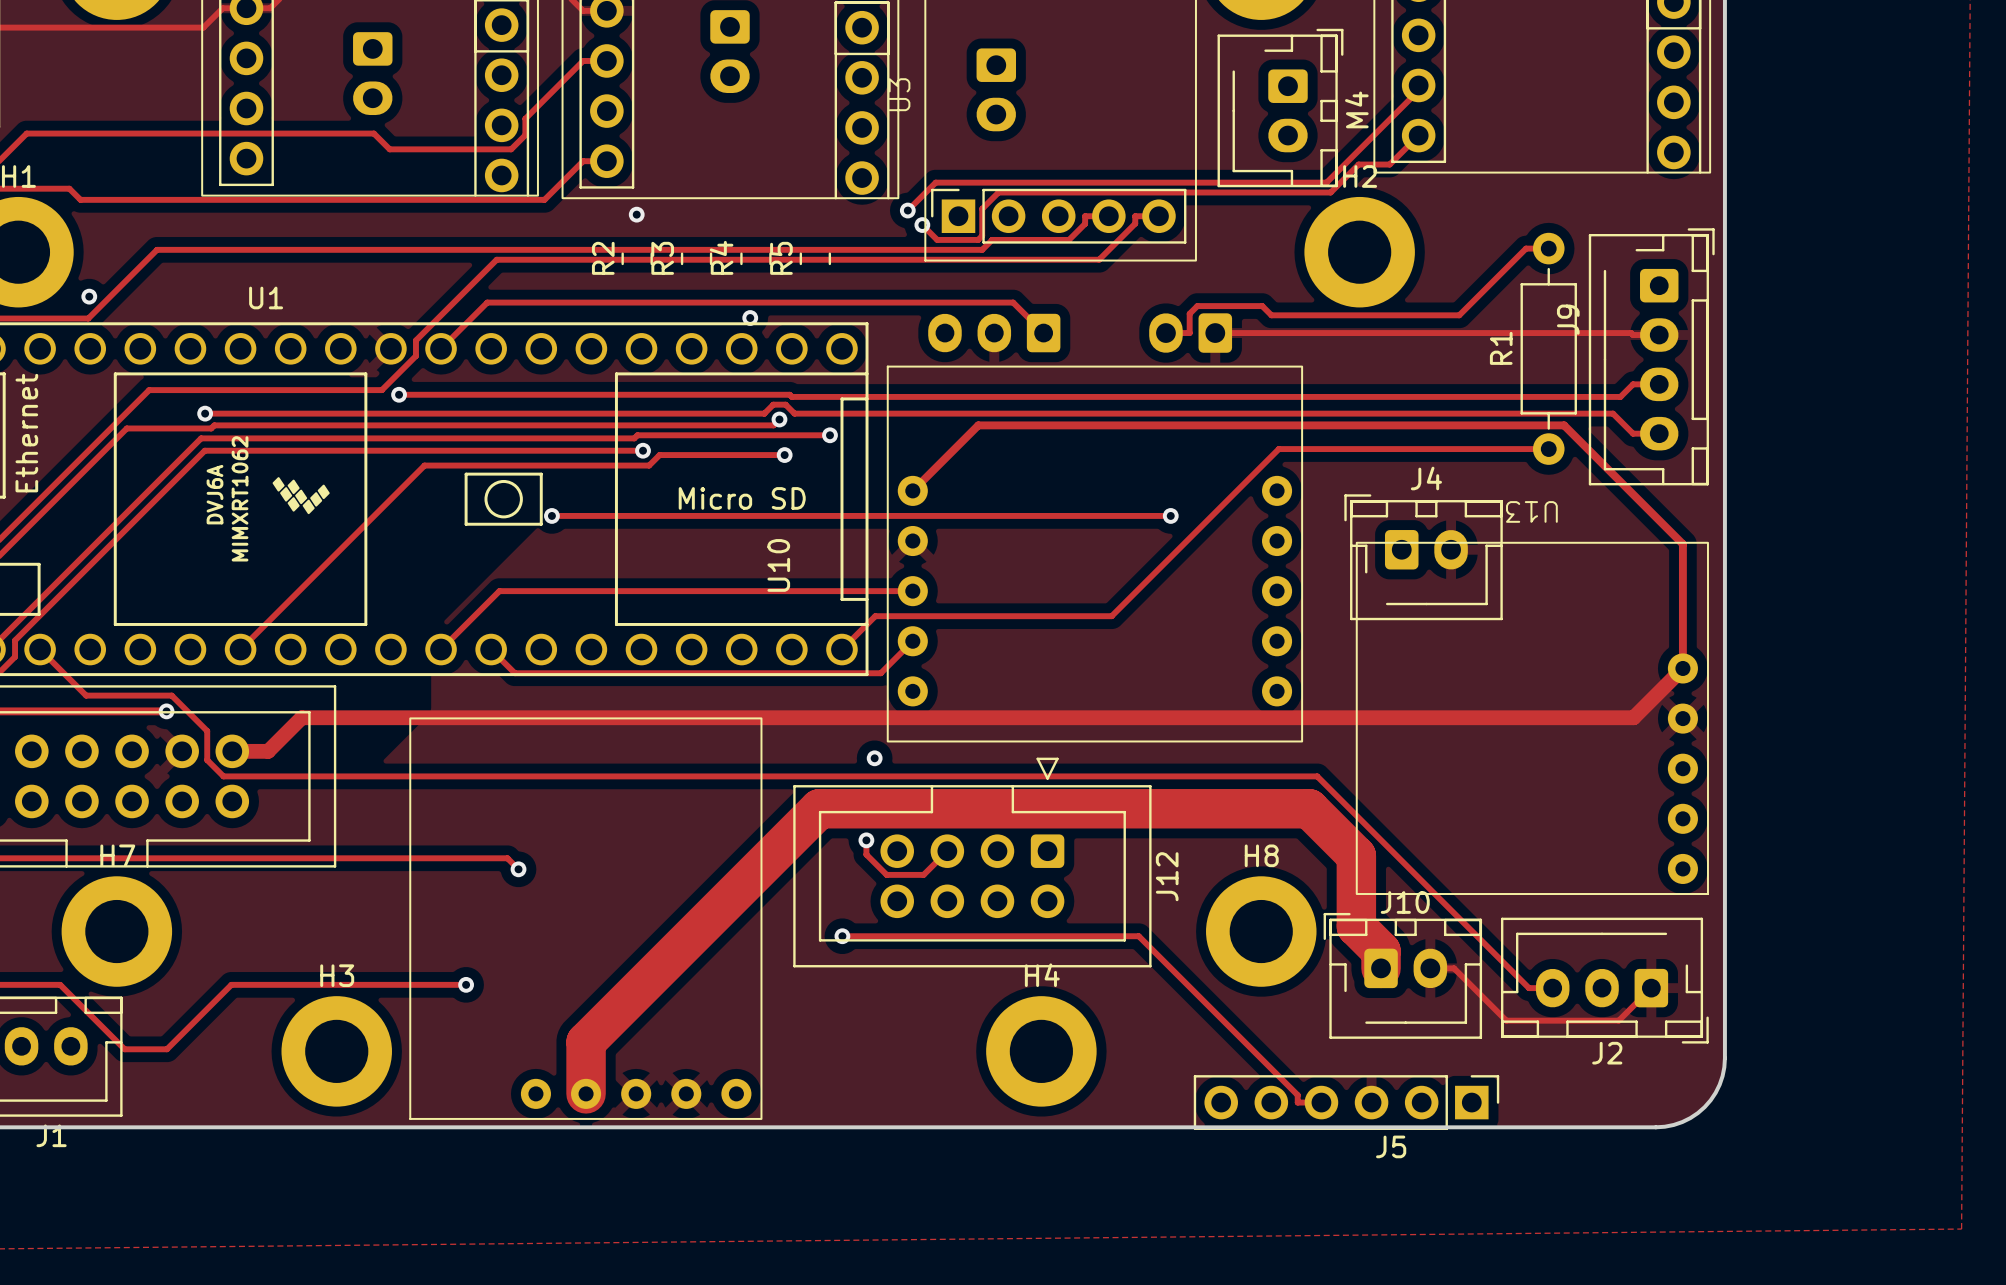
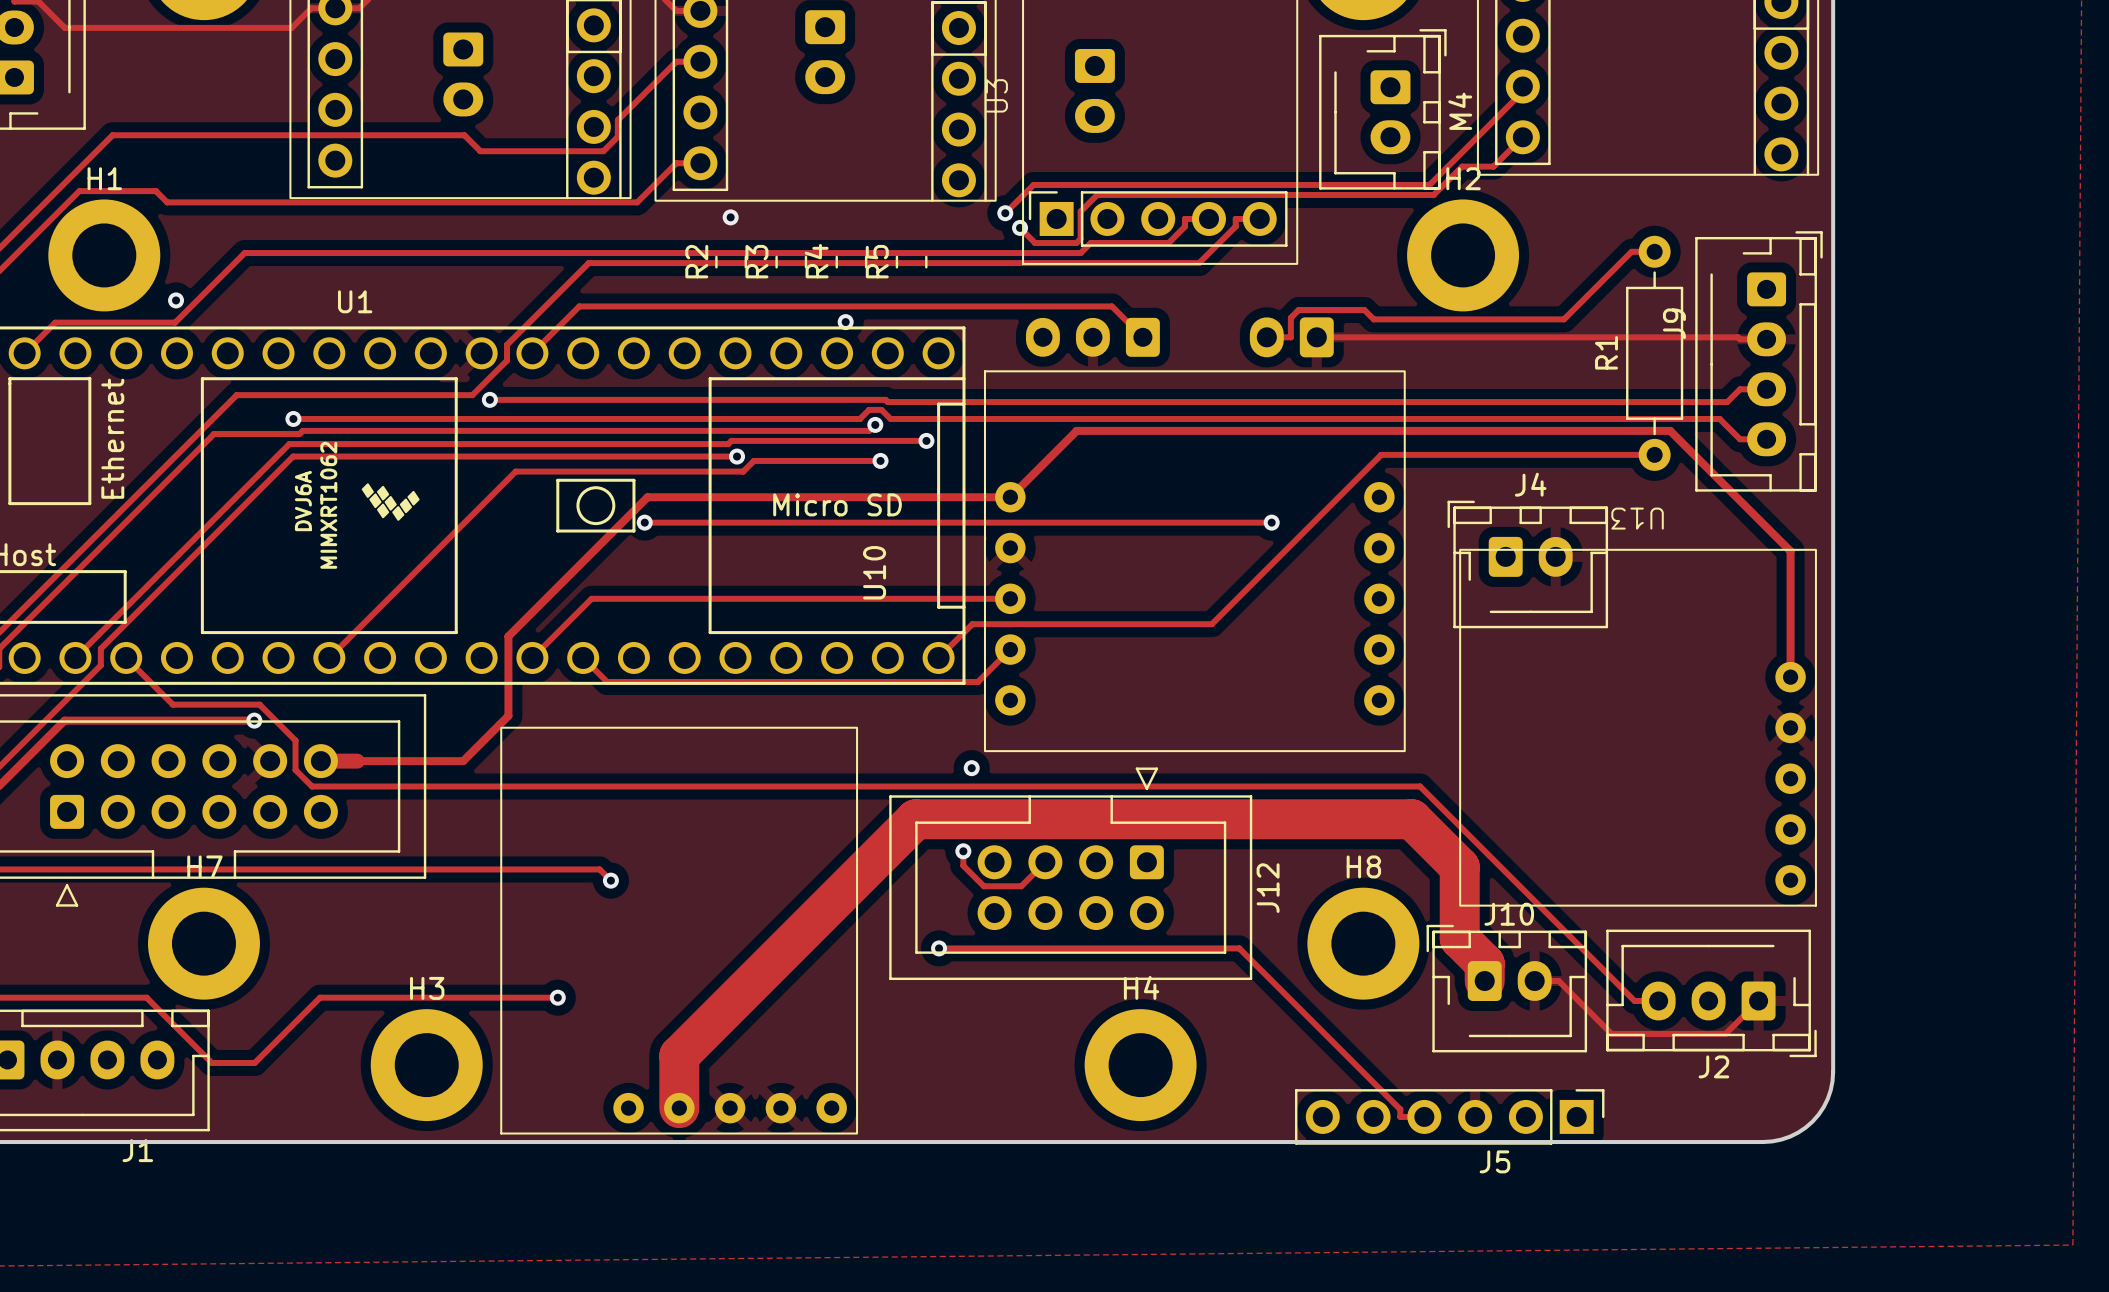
track: (1682, 668) (1633, 717) (301, 717) (268, 751) -> (1010, 497) (647, 497) (508, 636) (508, 715) (463, 761) (357, 761)

